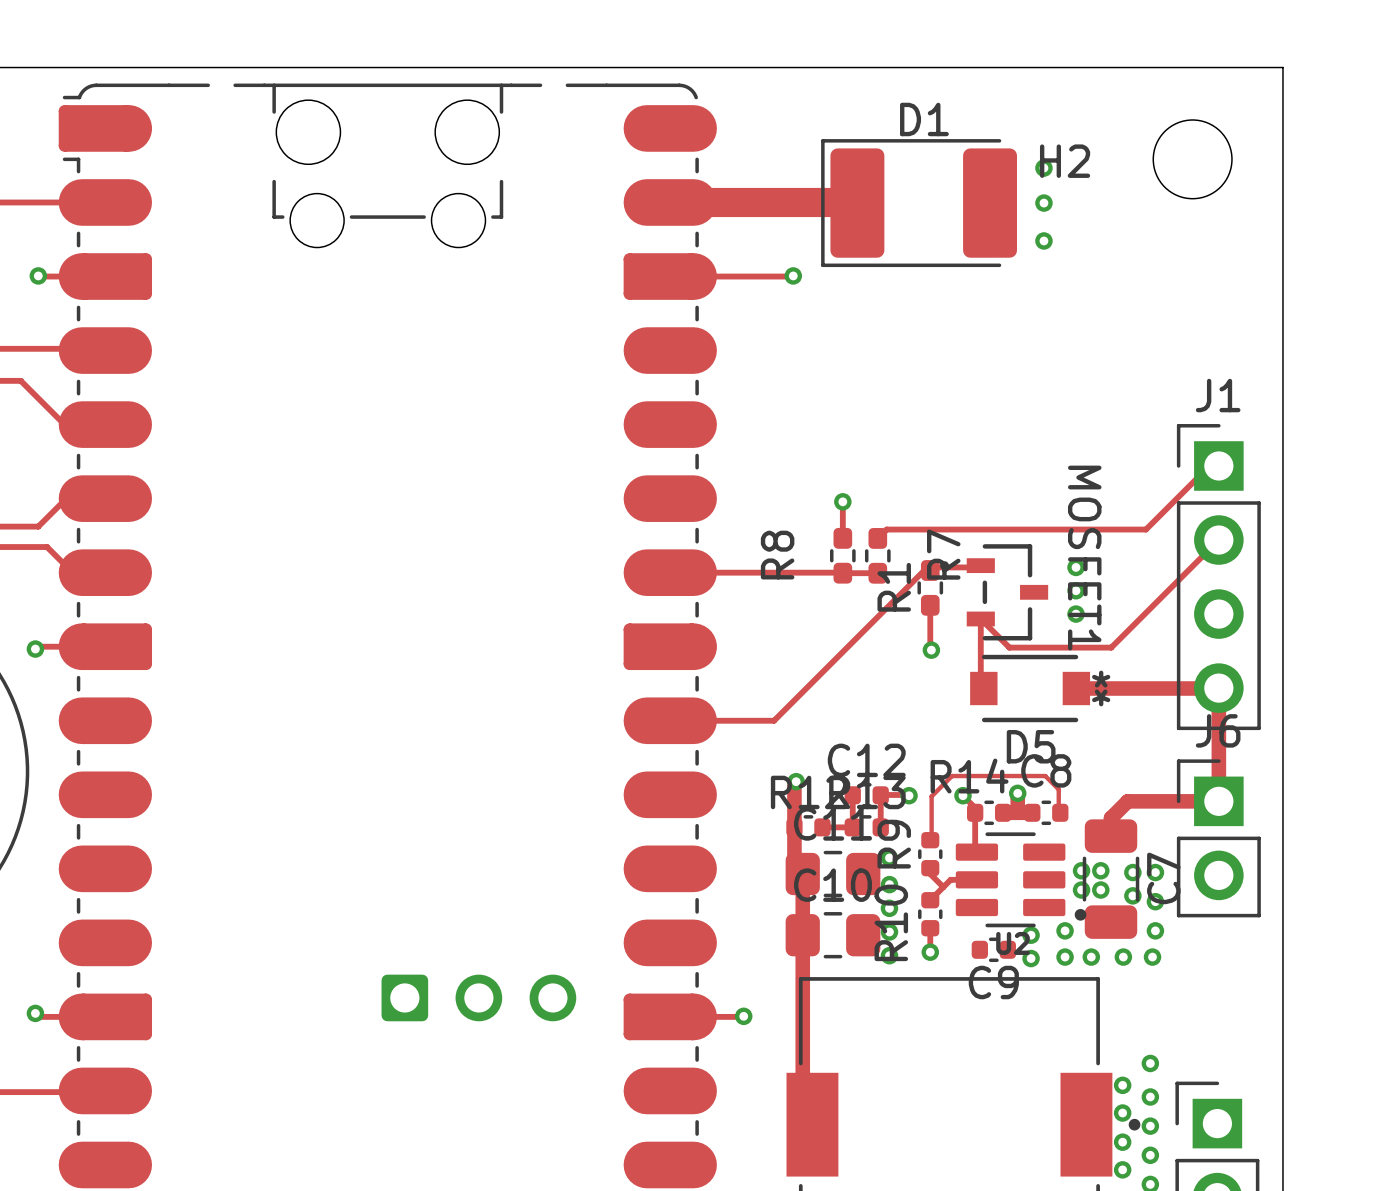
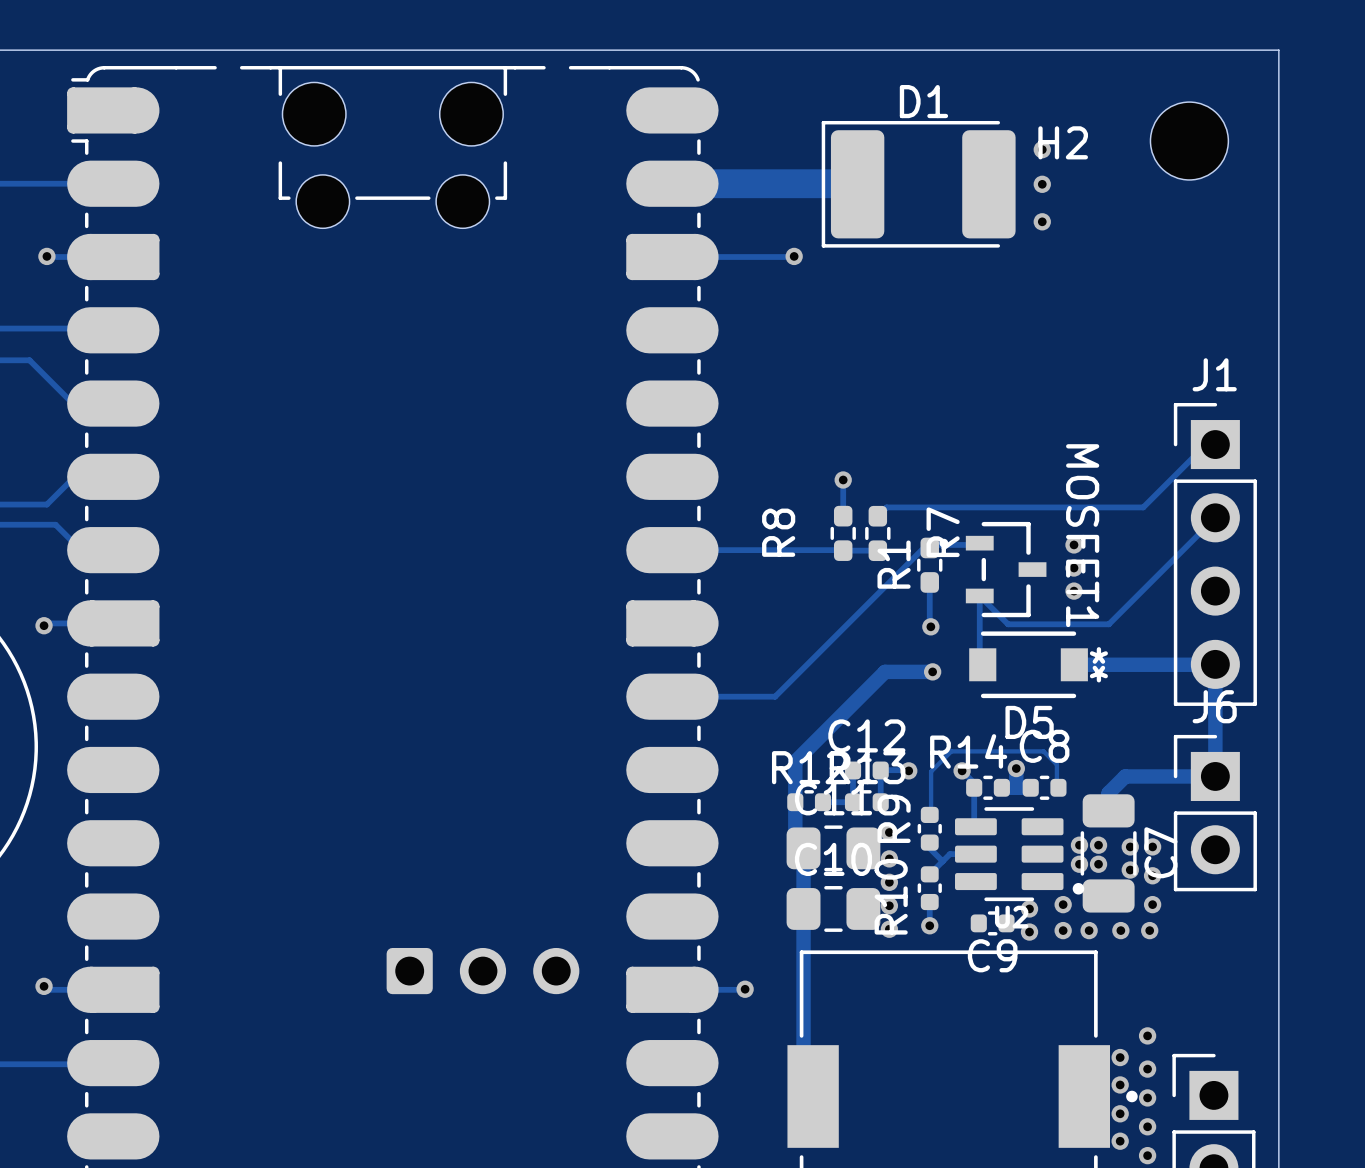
track: none -> (932, 671) (885, 671) (795, 761)
via position: (796, 781) -> (932, 671)

